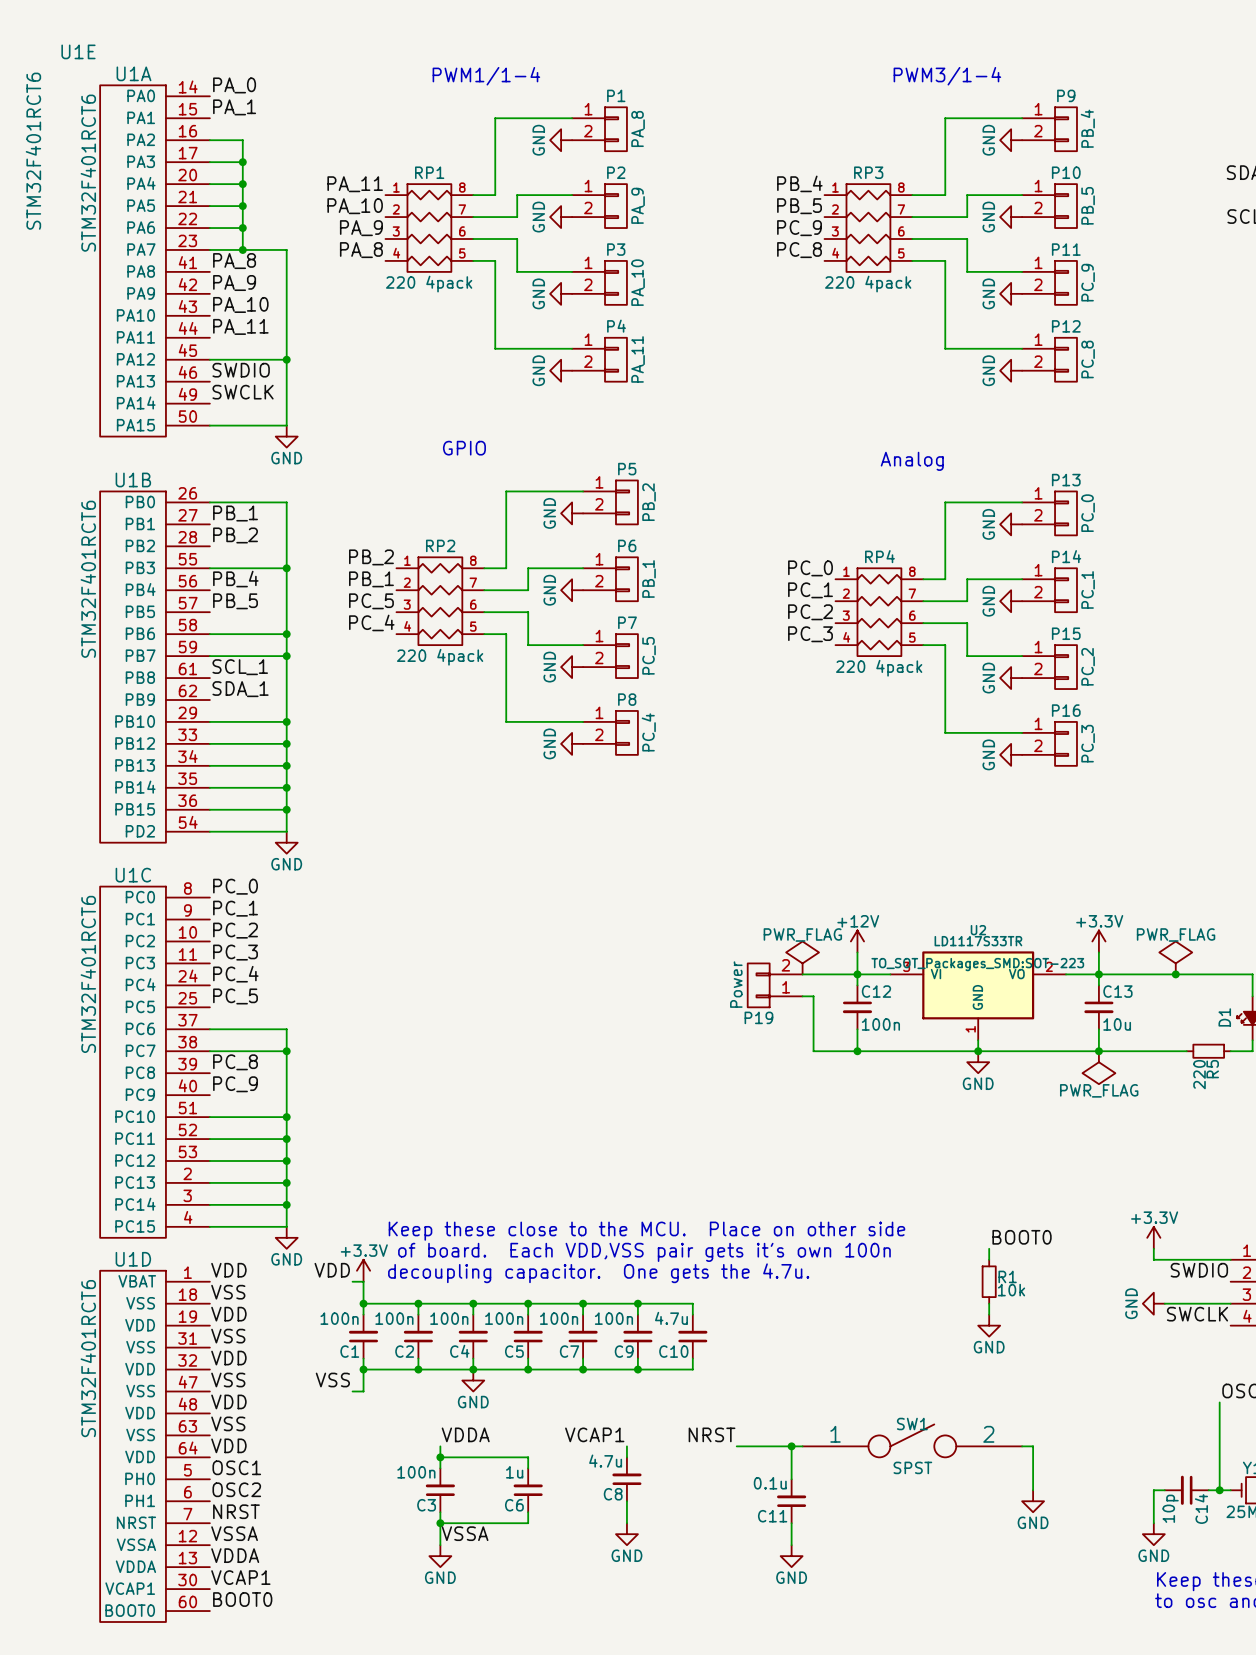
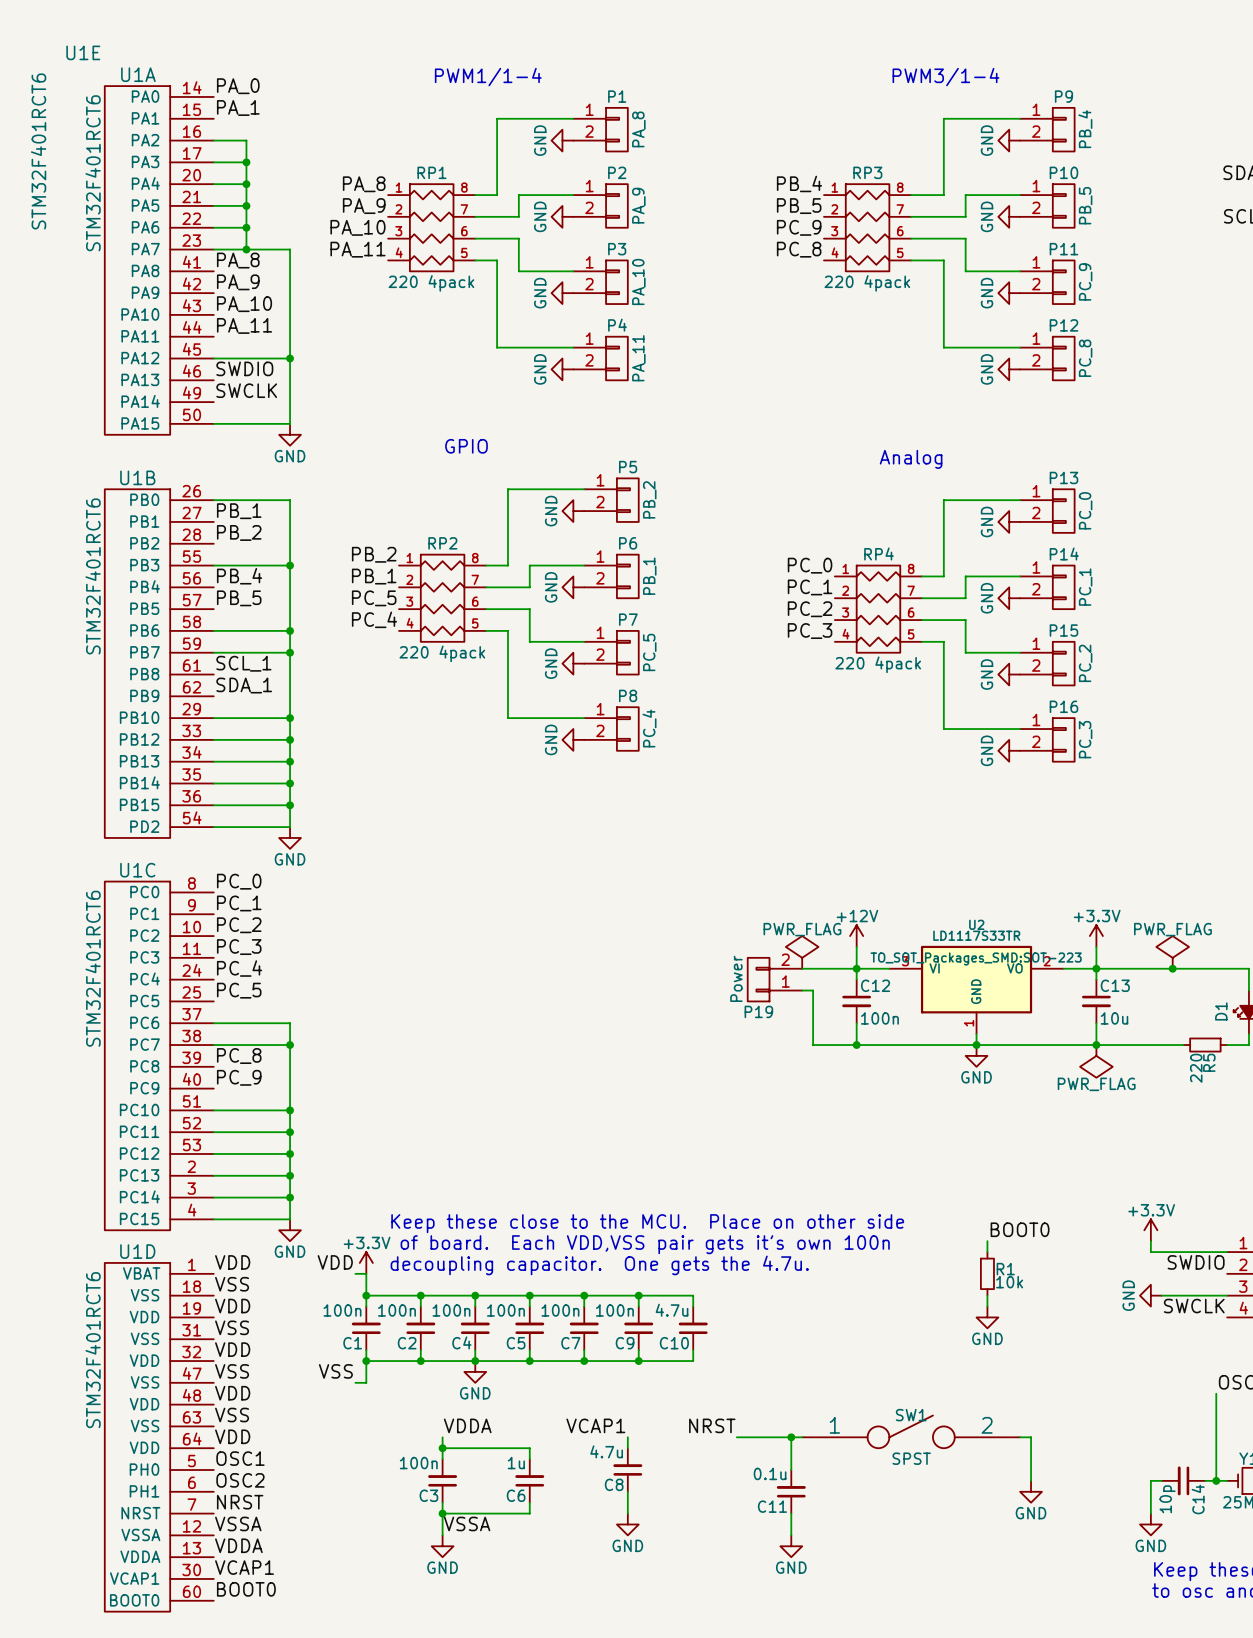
label: PA_11 (355, 184) -> PA_8 (364, 184)
label: PA_10 (355, 206) -> PA_9 (364, 206)
label: PA_9 (361, 228) -> PA_10 (357, 227)
label: PA_8 (361, 250) -> PA_11 (357, 249)

